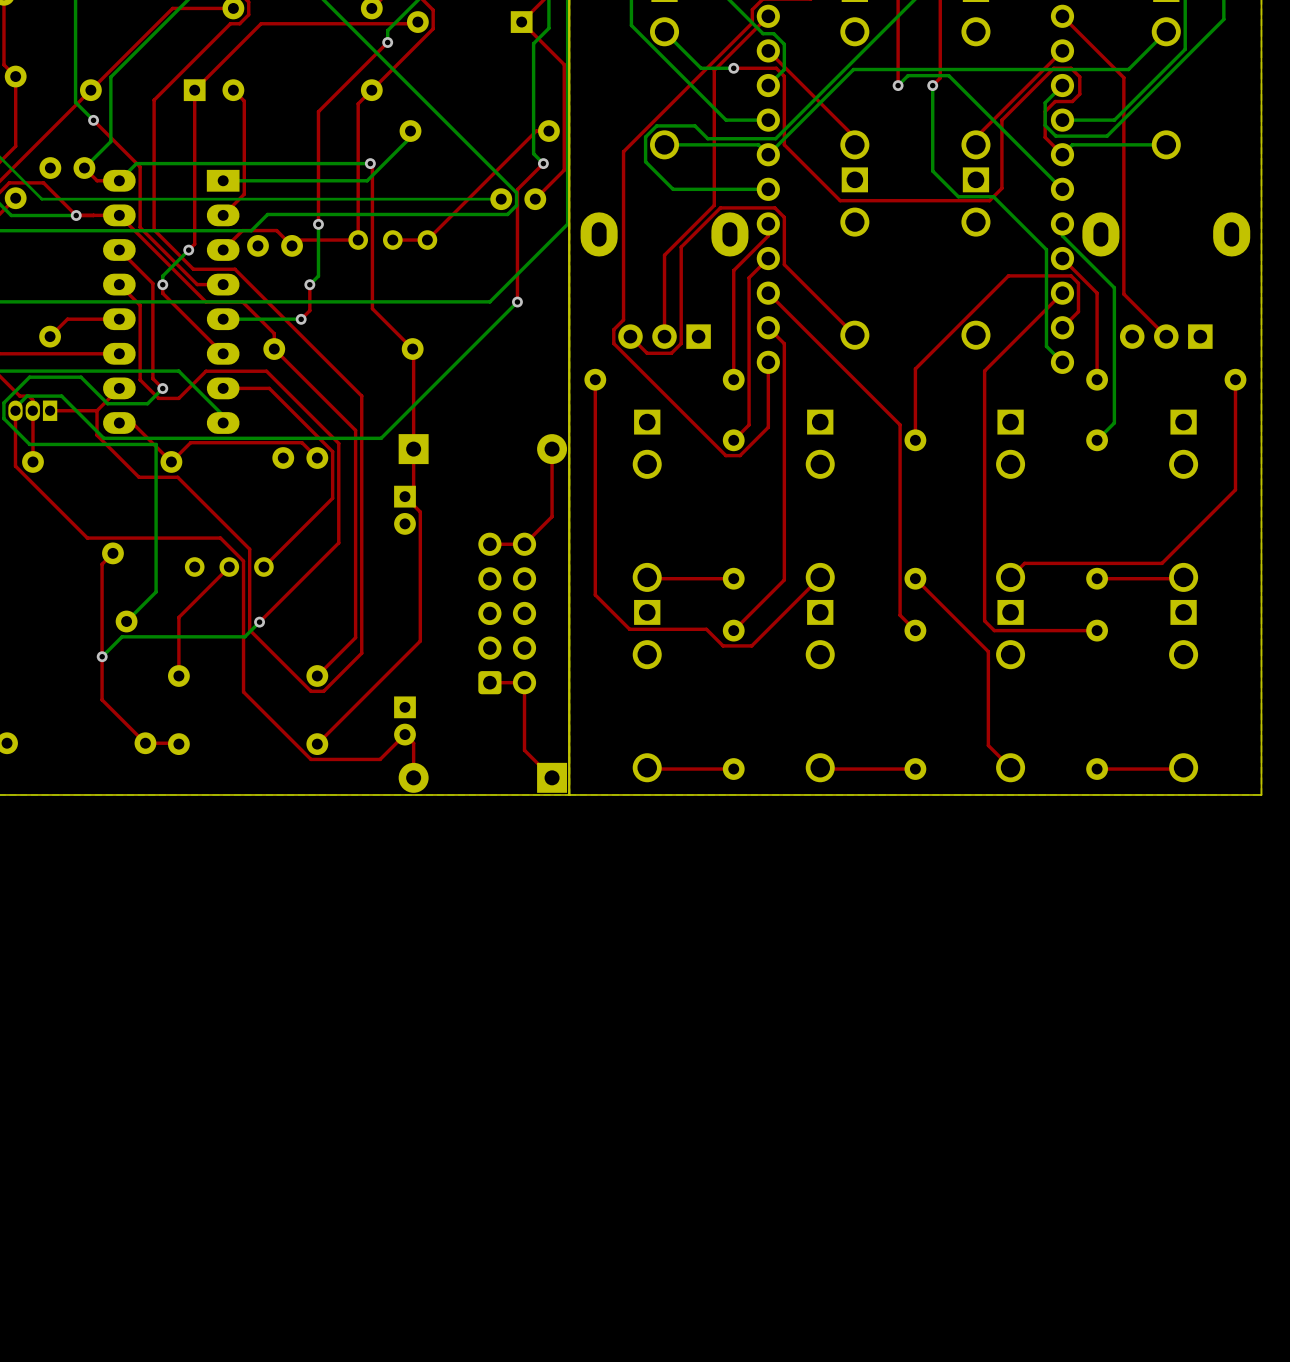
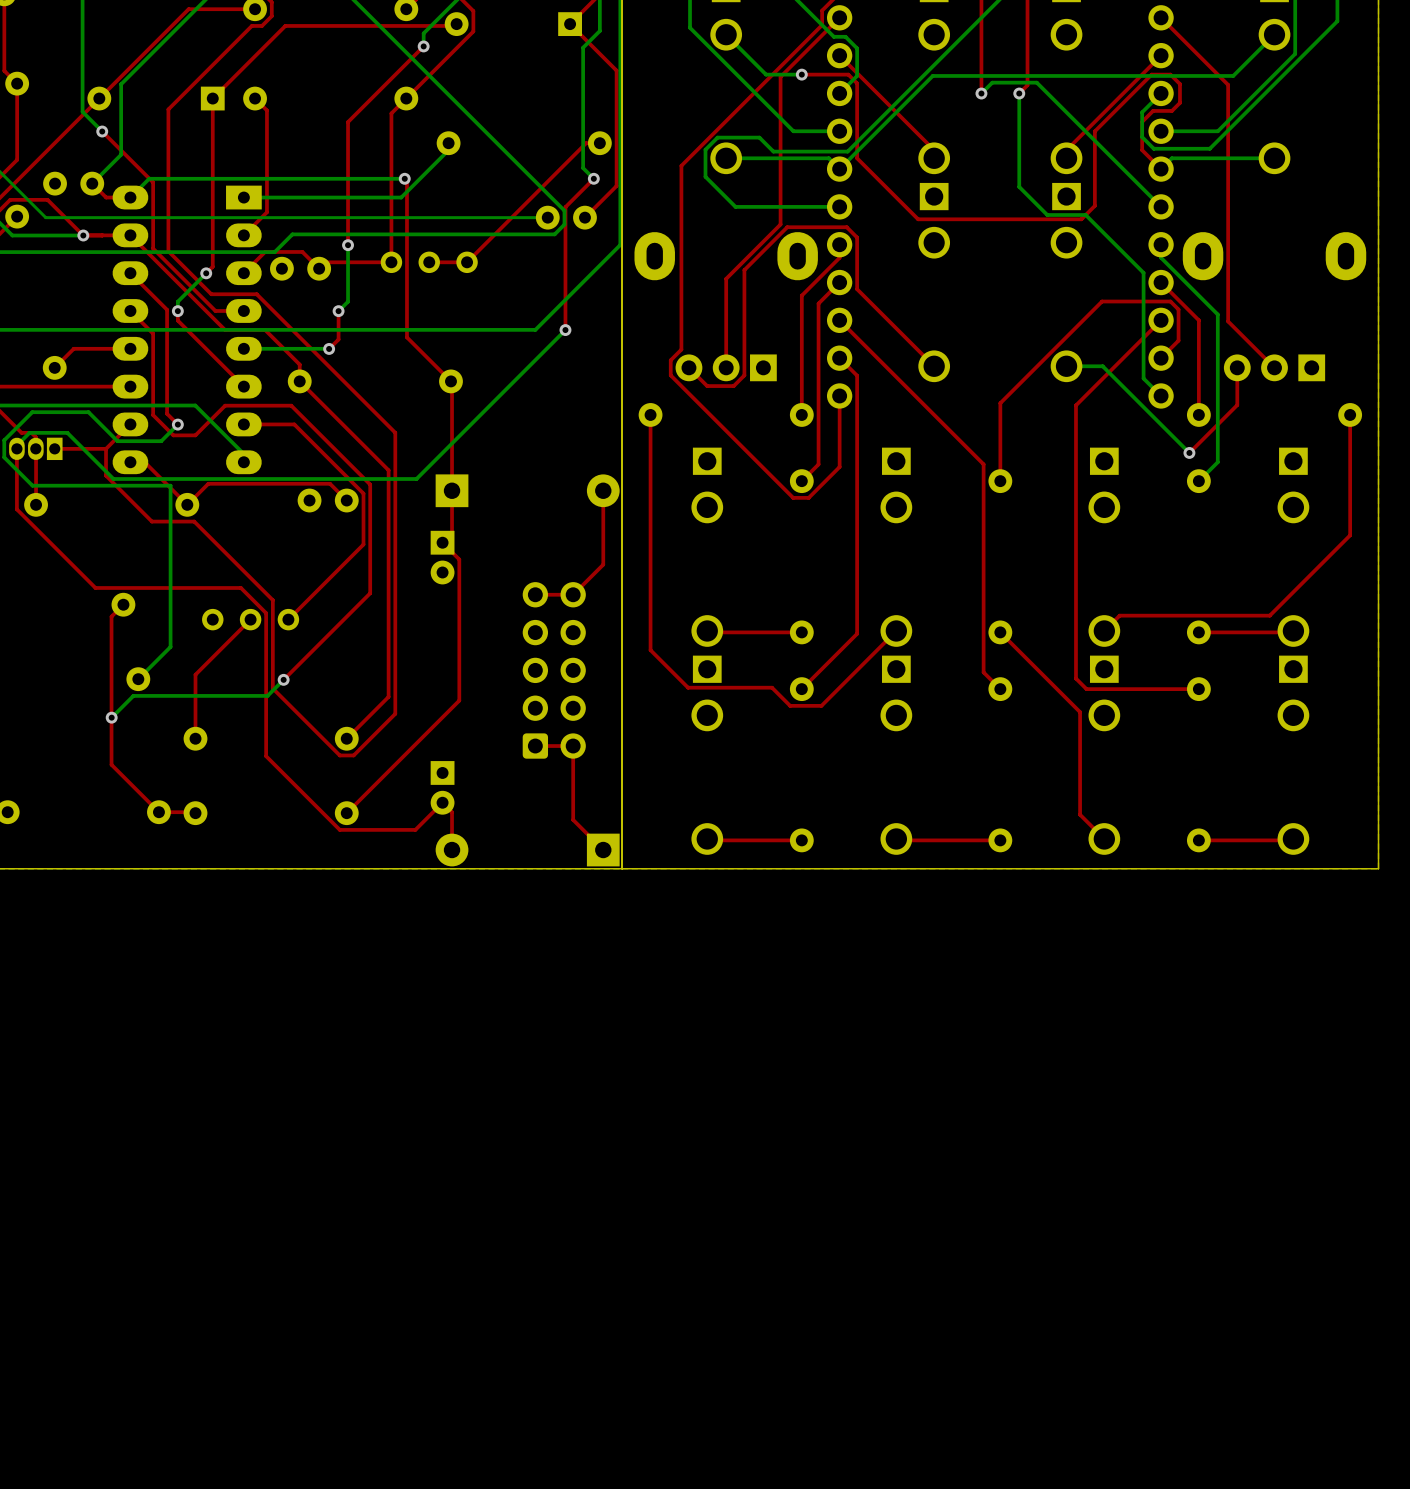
bottom track: none -> (1066, 366) (1102, 366) (1189, 452)
top track: none -> (1237, 367) (1237, 405) (1189, 452)
via: none -> (1189, 452)

